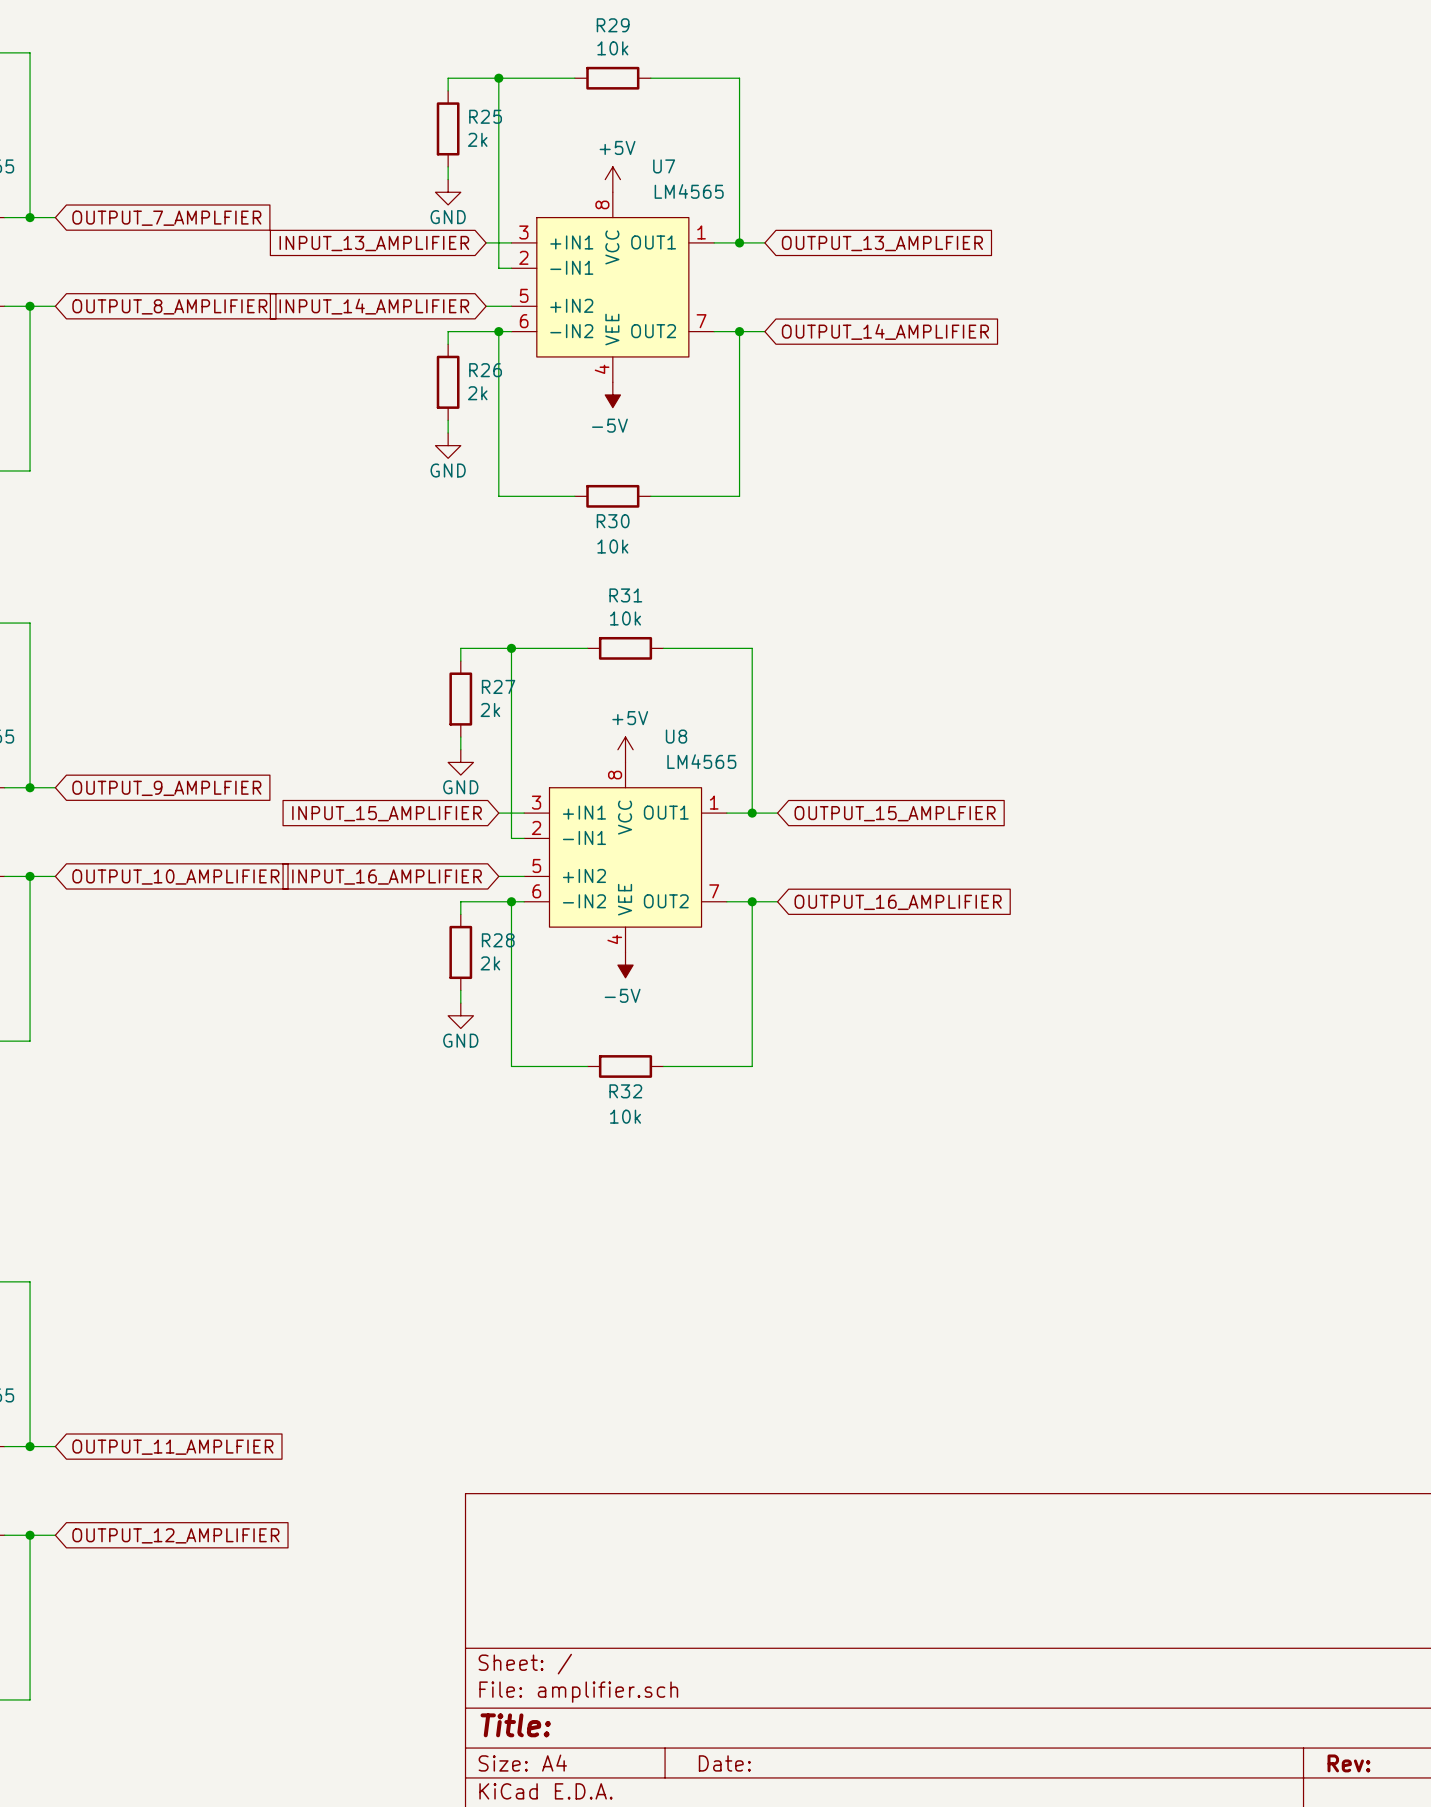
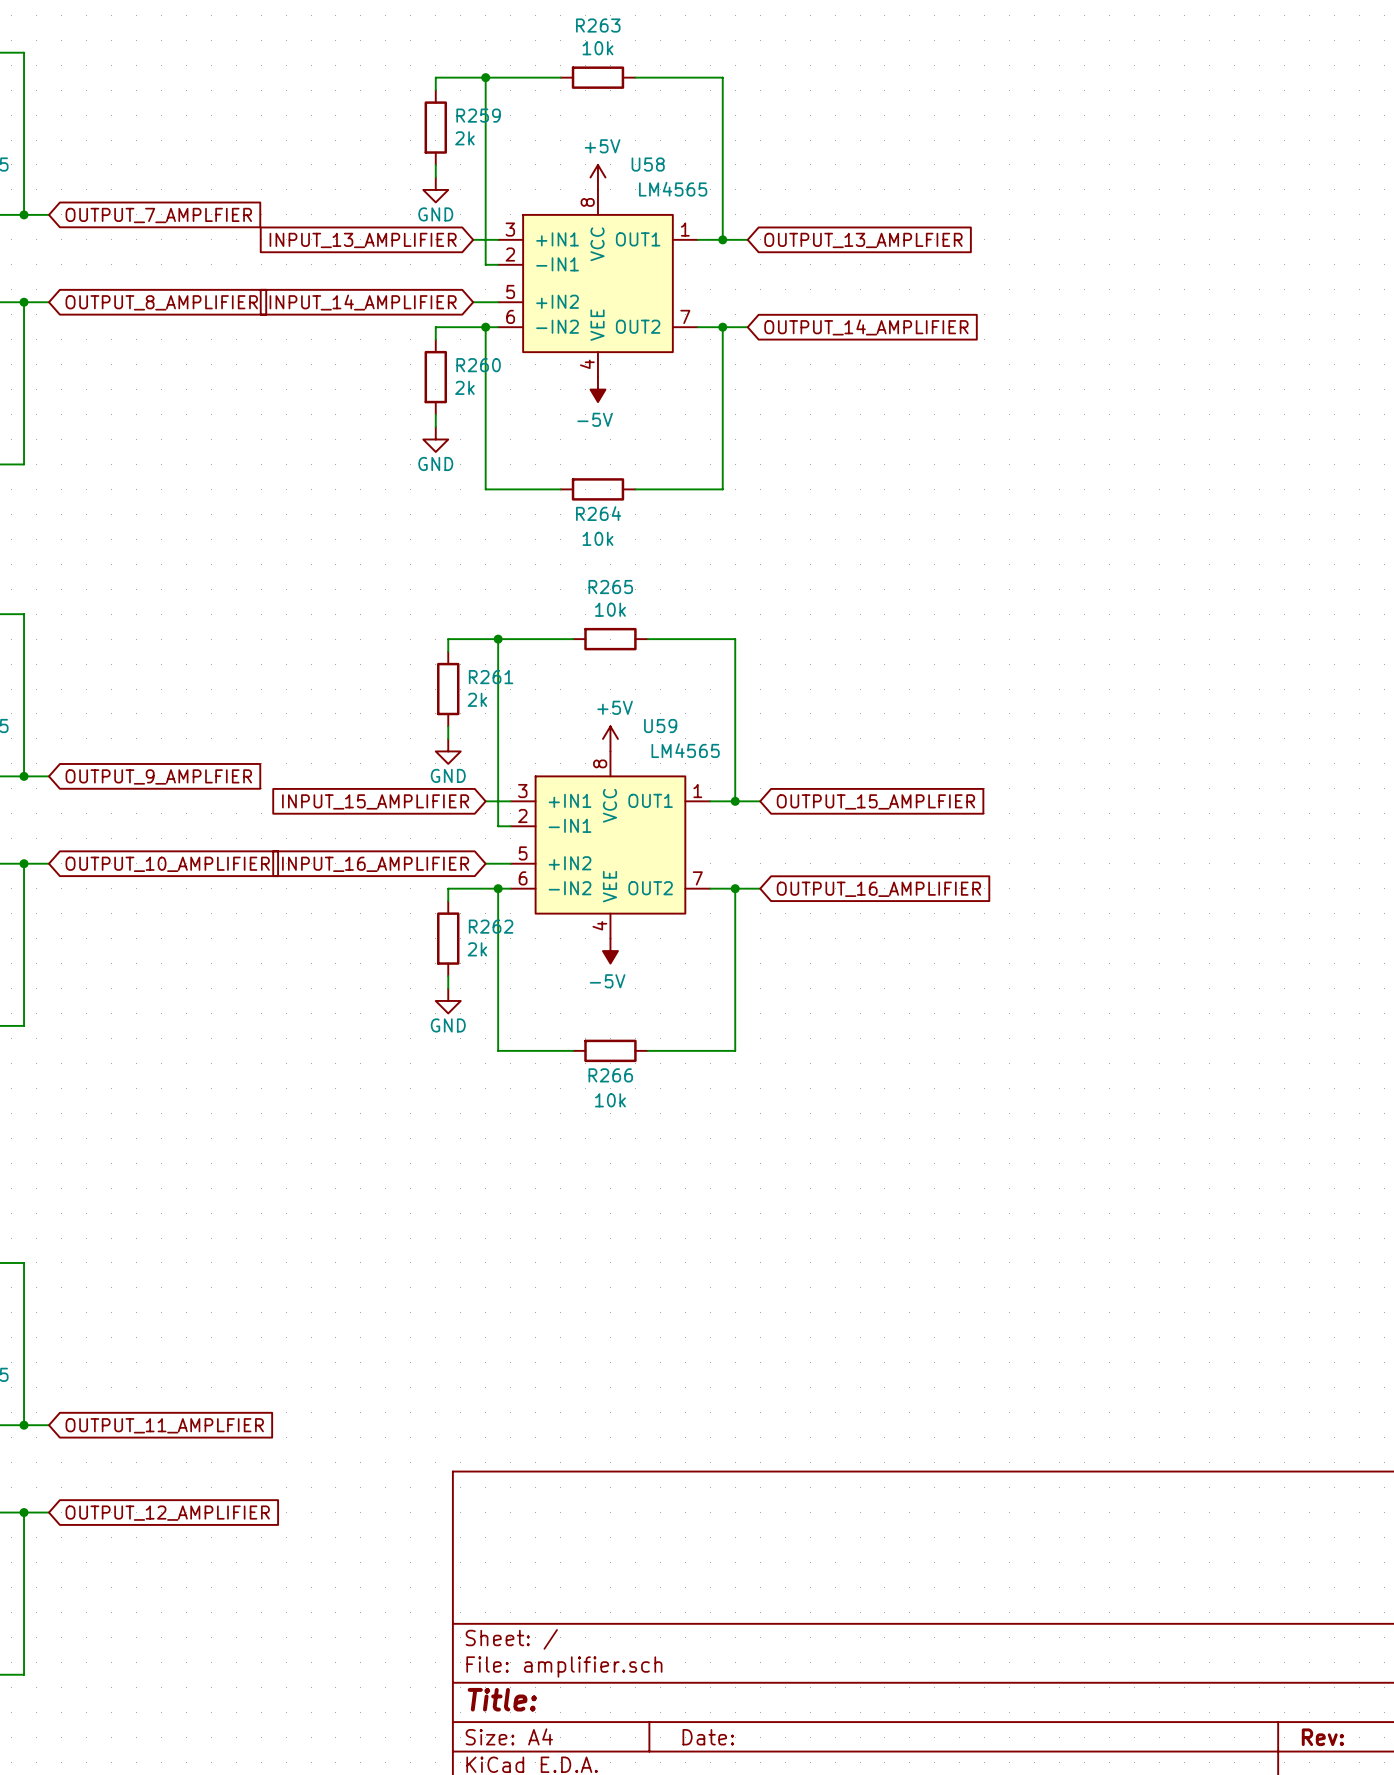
R29 name: R29 (613, 25) -> R263 (598, 25)
R25 name: R25 (485, 116) -> R259 (478, 115)
U7 name: U7 (664, 166) -> U58 (648, 164)
R26 name: R26 (485, 370) -> R260 (478, 365)
R30 name: R30 (613, 521) -> R264 (598, 513)
R31 name: R31 (625, 595) -> R265 (610, 587)
R27 name: R27 (498, 686) -> R261 (491, 677)
U8 name: U8 (676, 736) -> U59 (660, 726)
R28 name: R28 (498, 940) -> R262 (491, 926)
R32 name: R32 (625, 1091) -> R266 (610, 1075)

